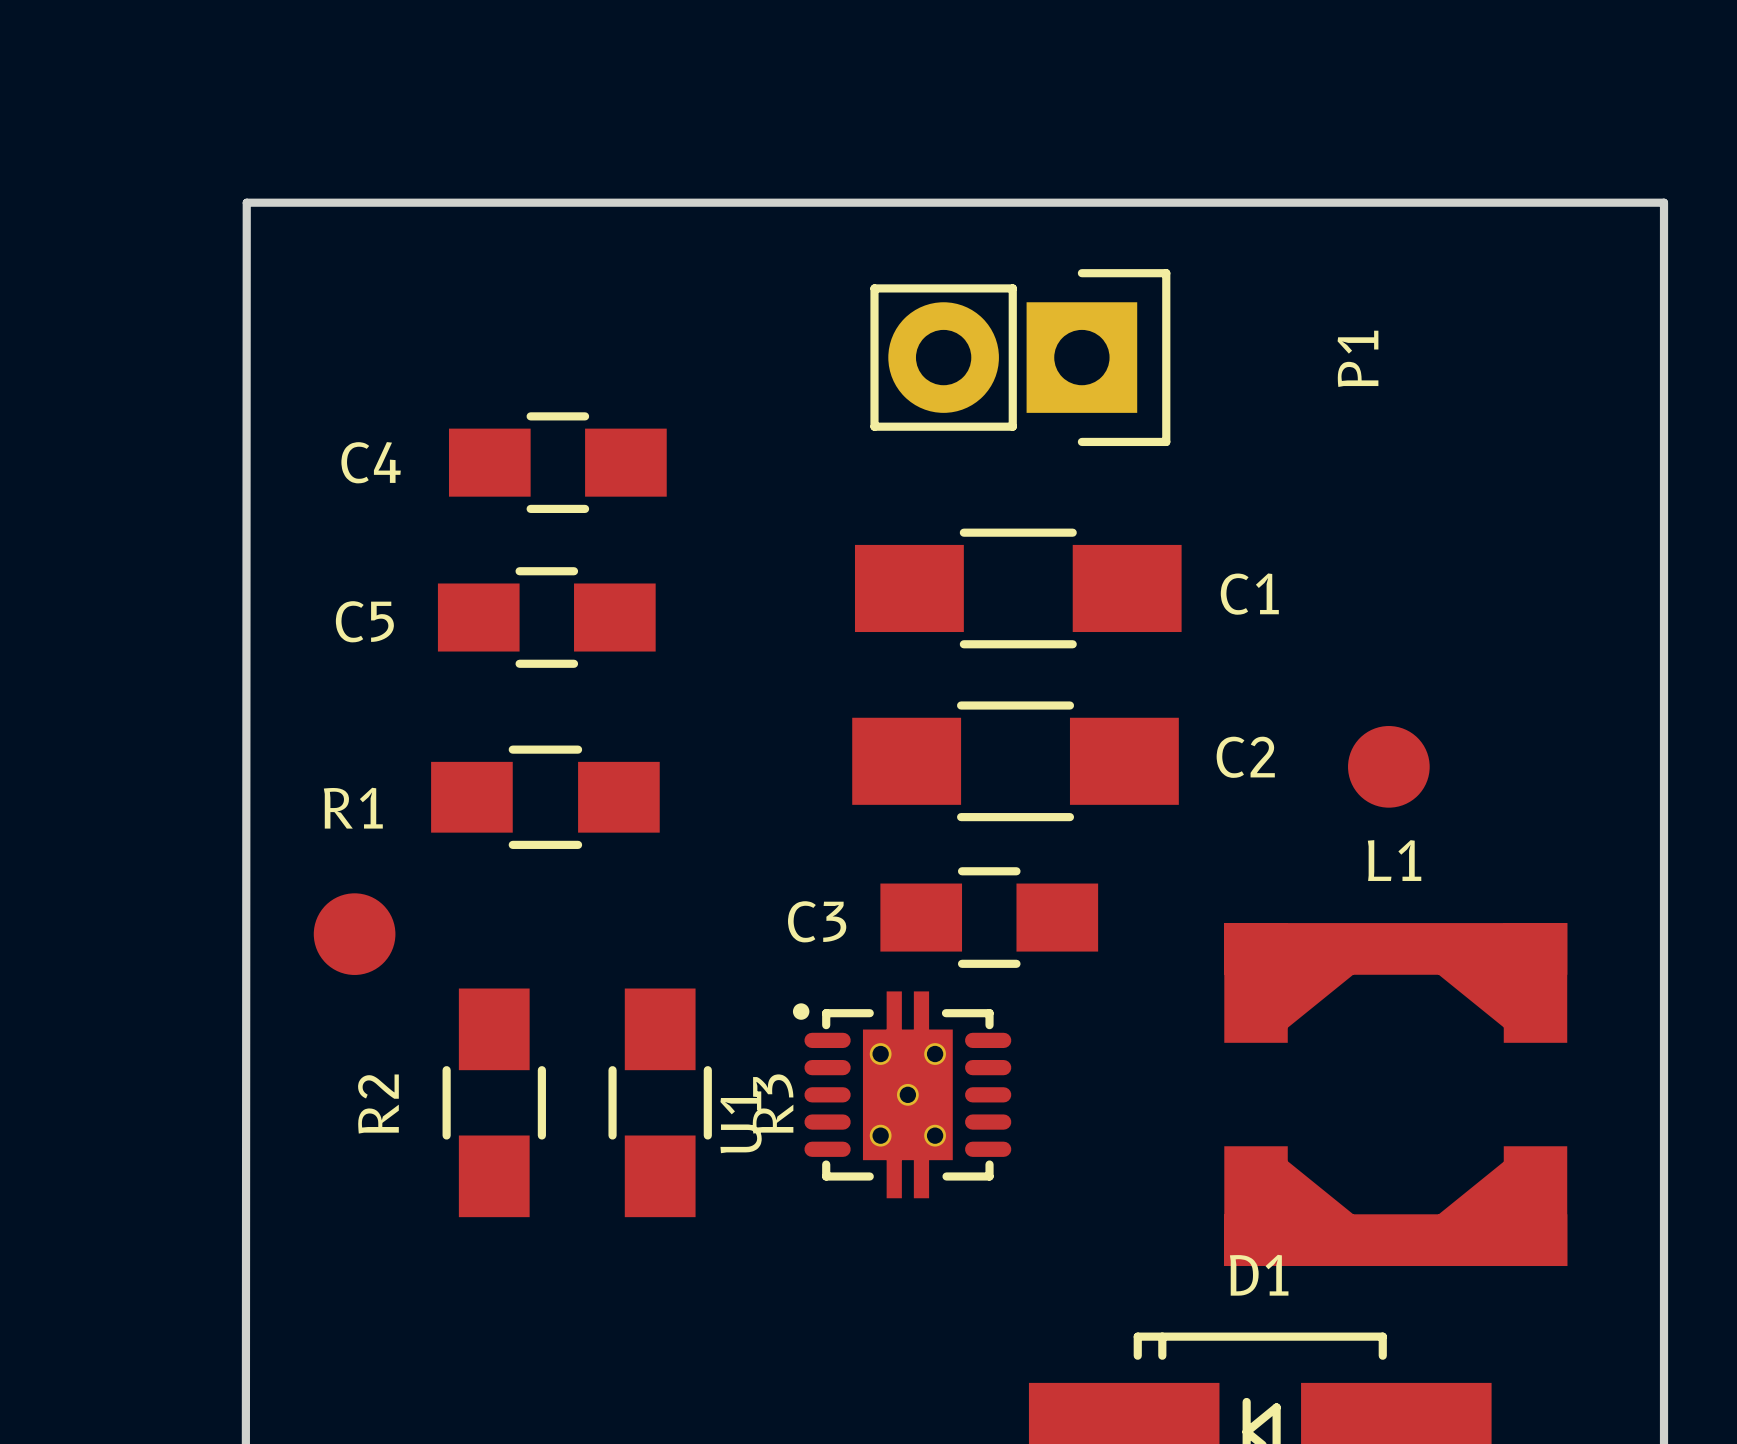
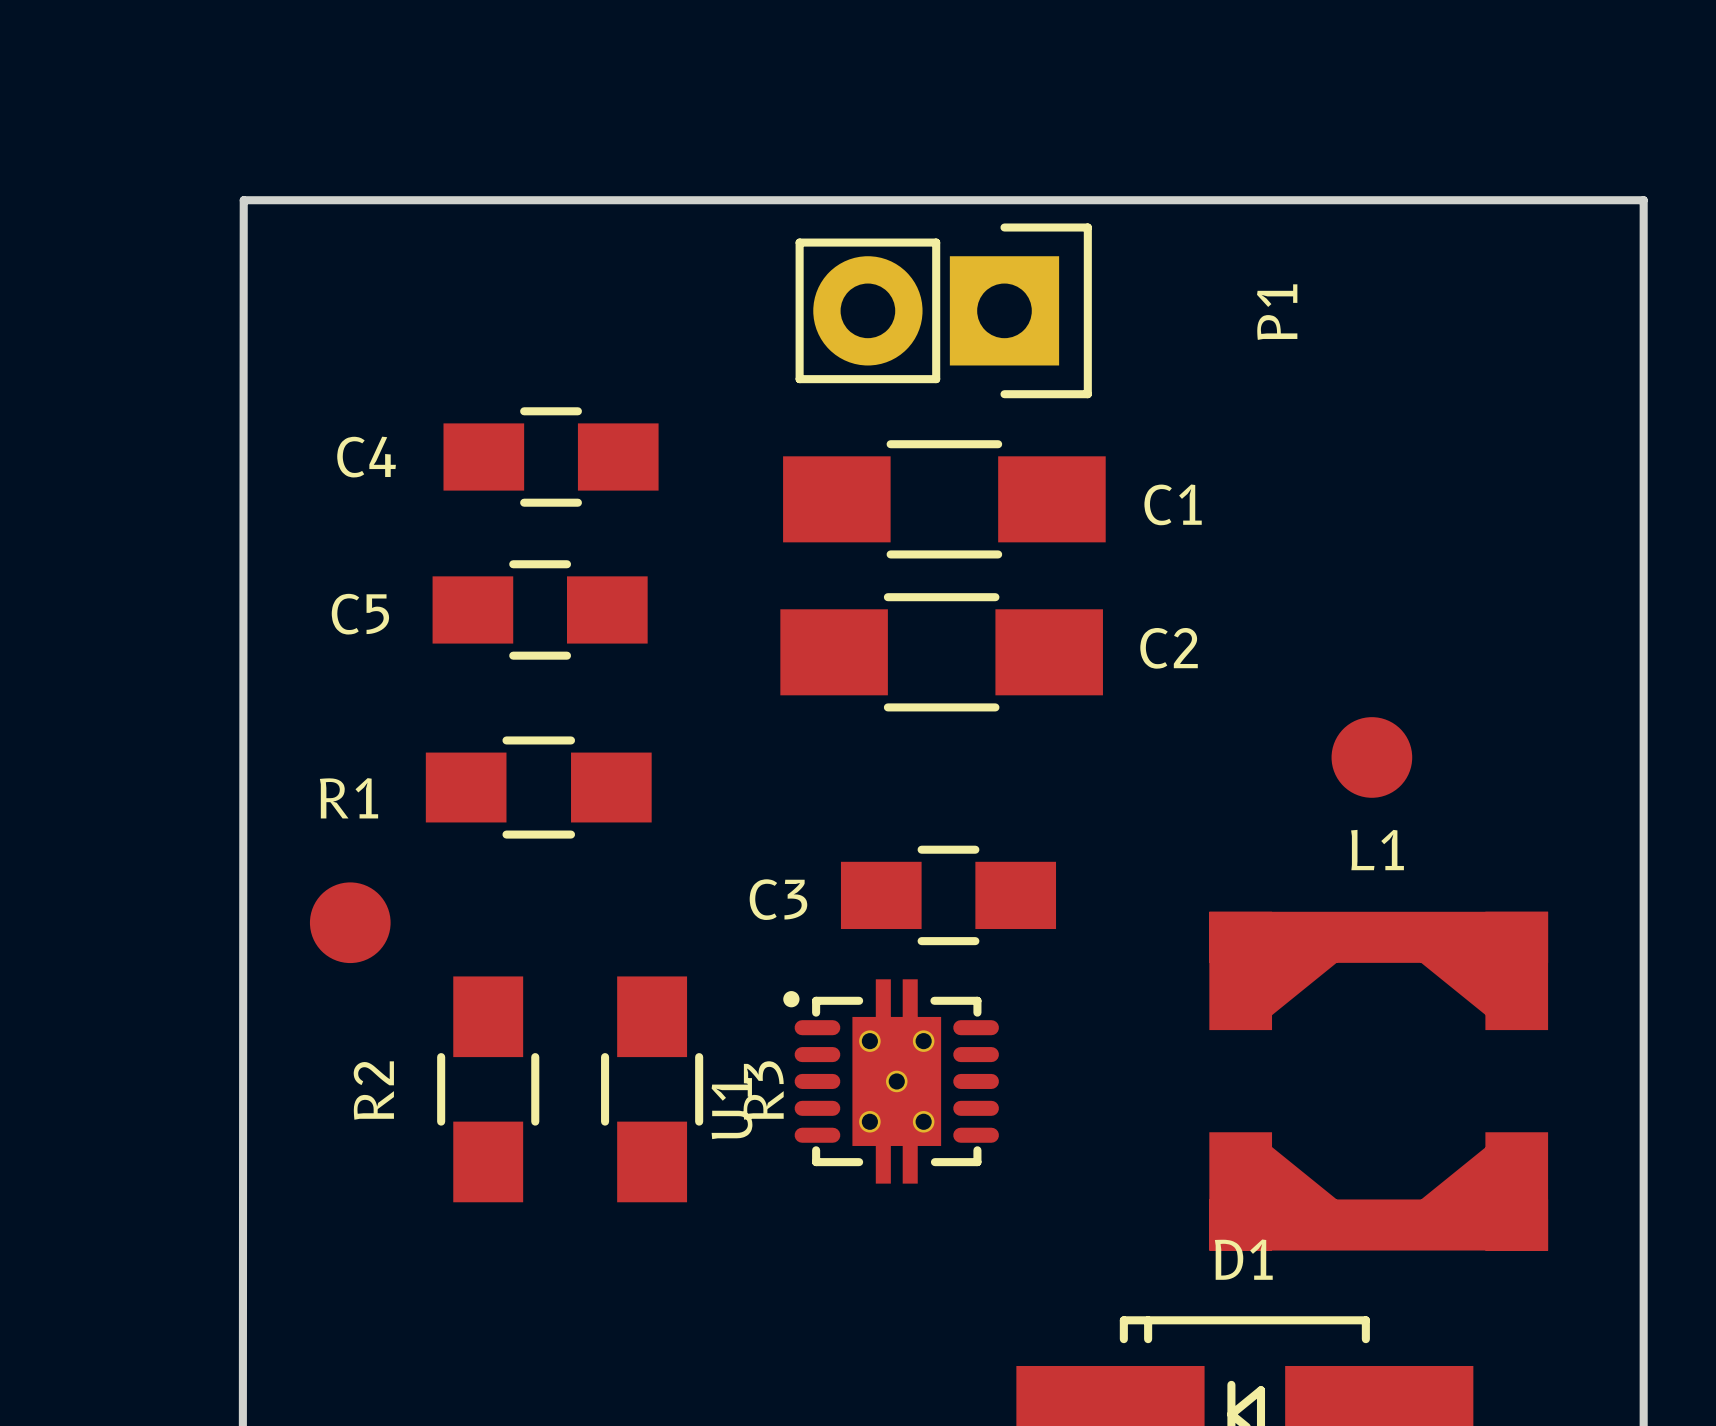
P1 position: (1020, 357) -> (943, 310)
C1 position: (1018, 588) -> (944, 499)
C2 position: (1015, 761) -> (941, 652)
C3 position: (989, 917) -> (948, 895)

